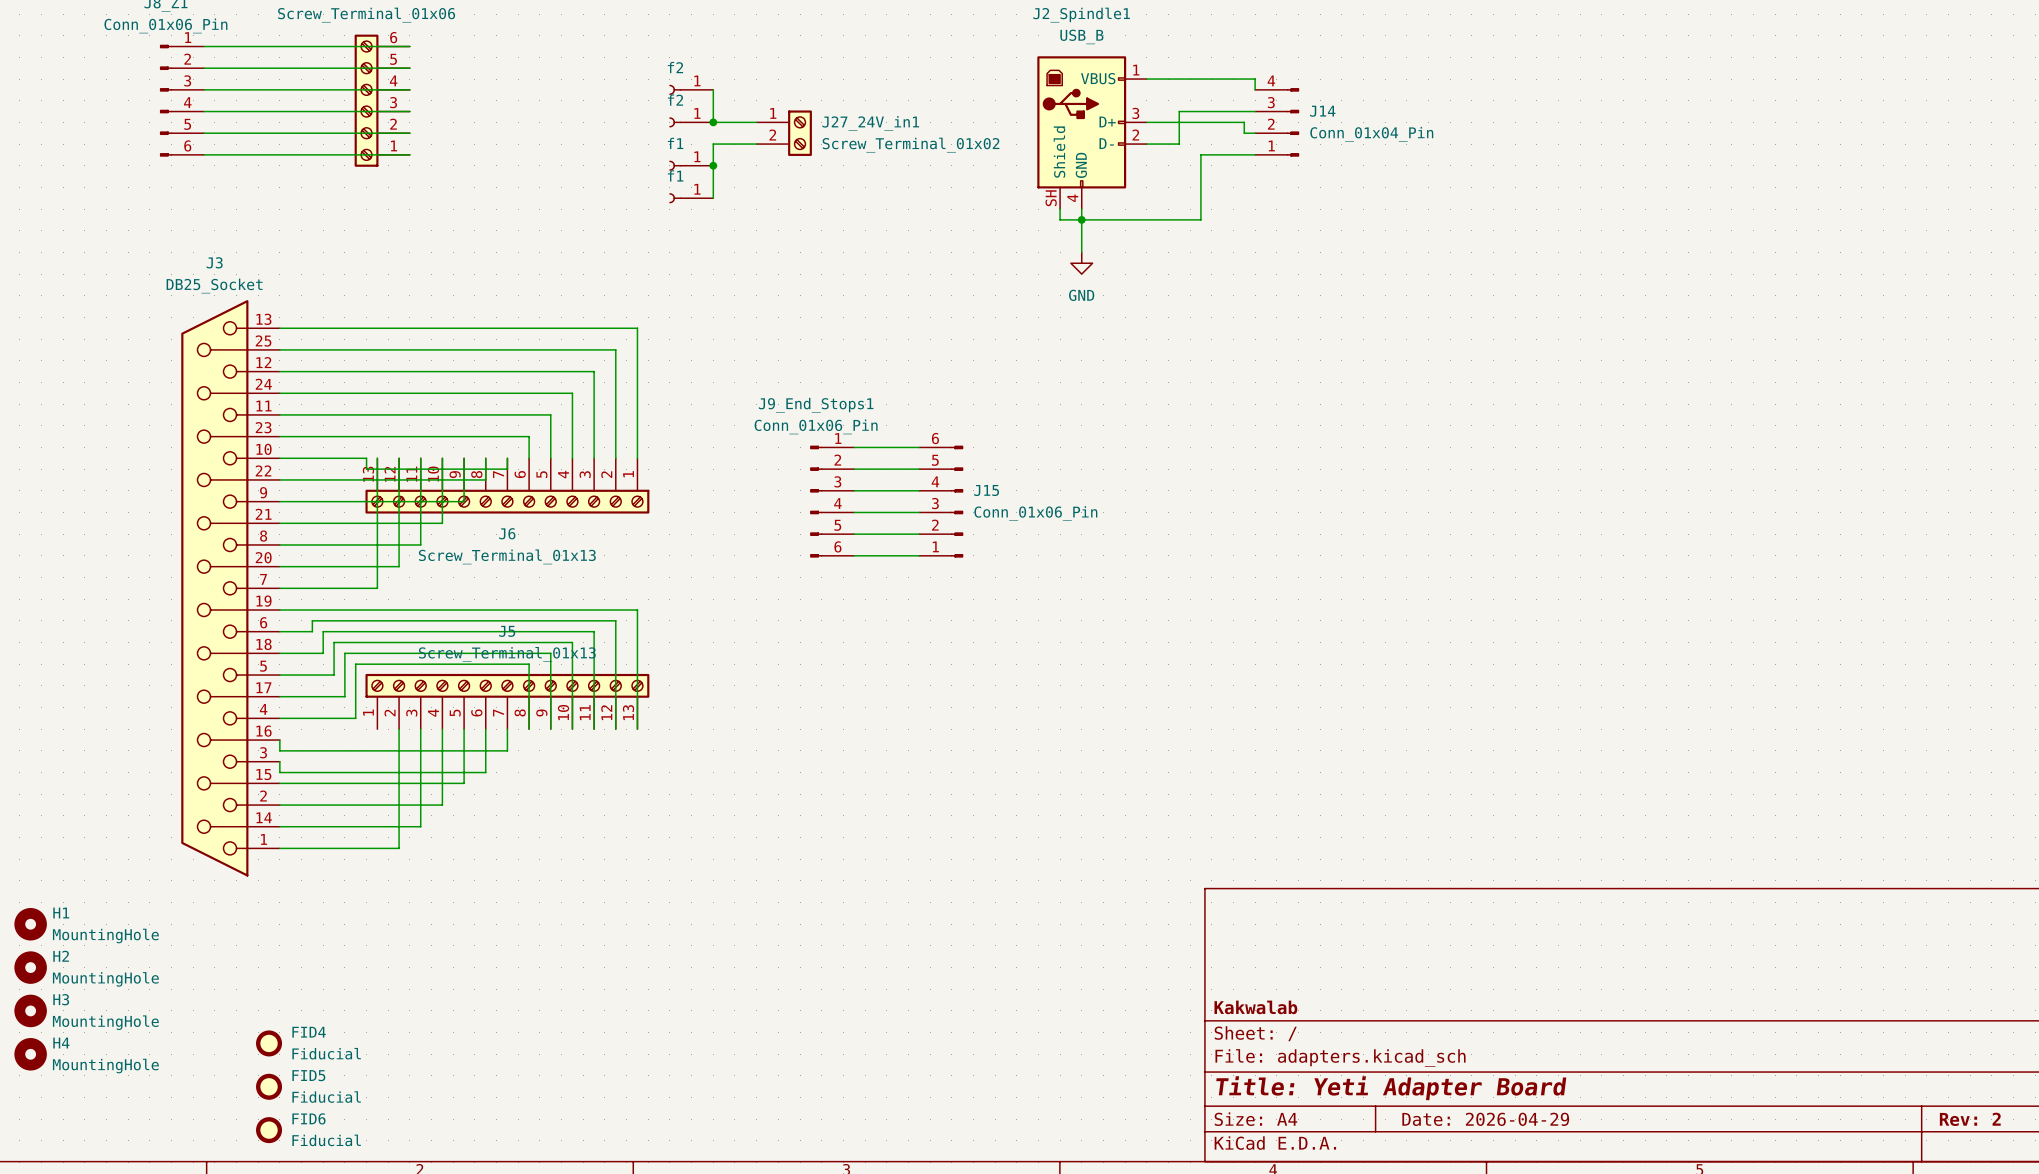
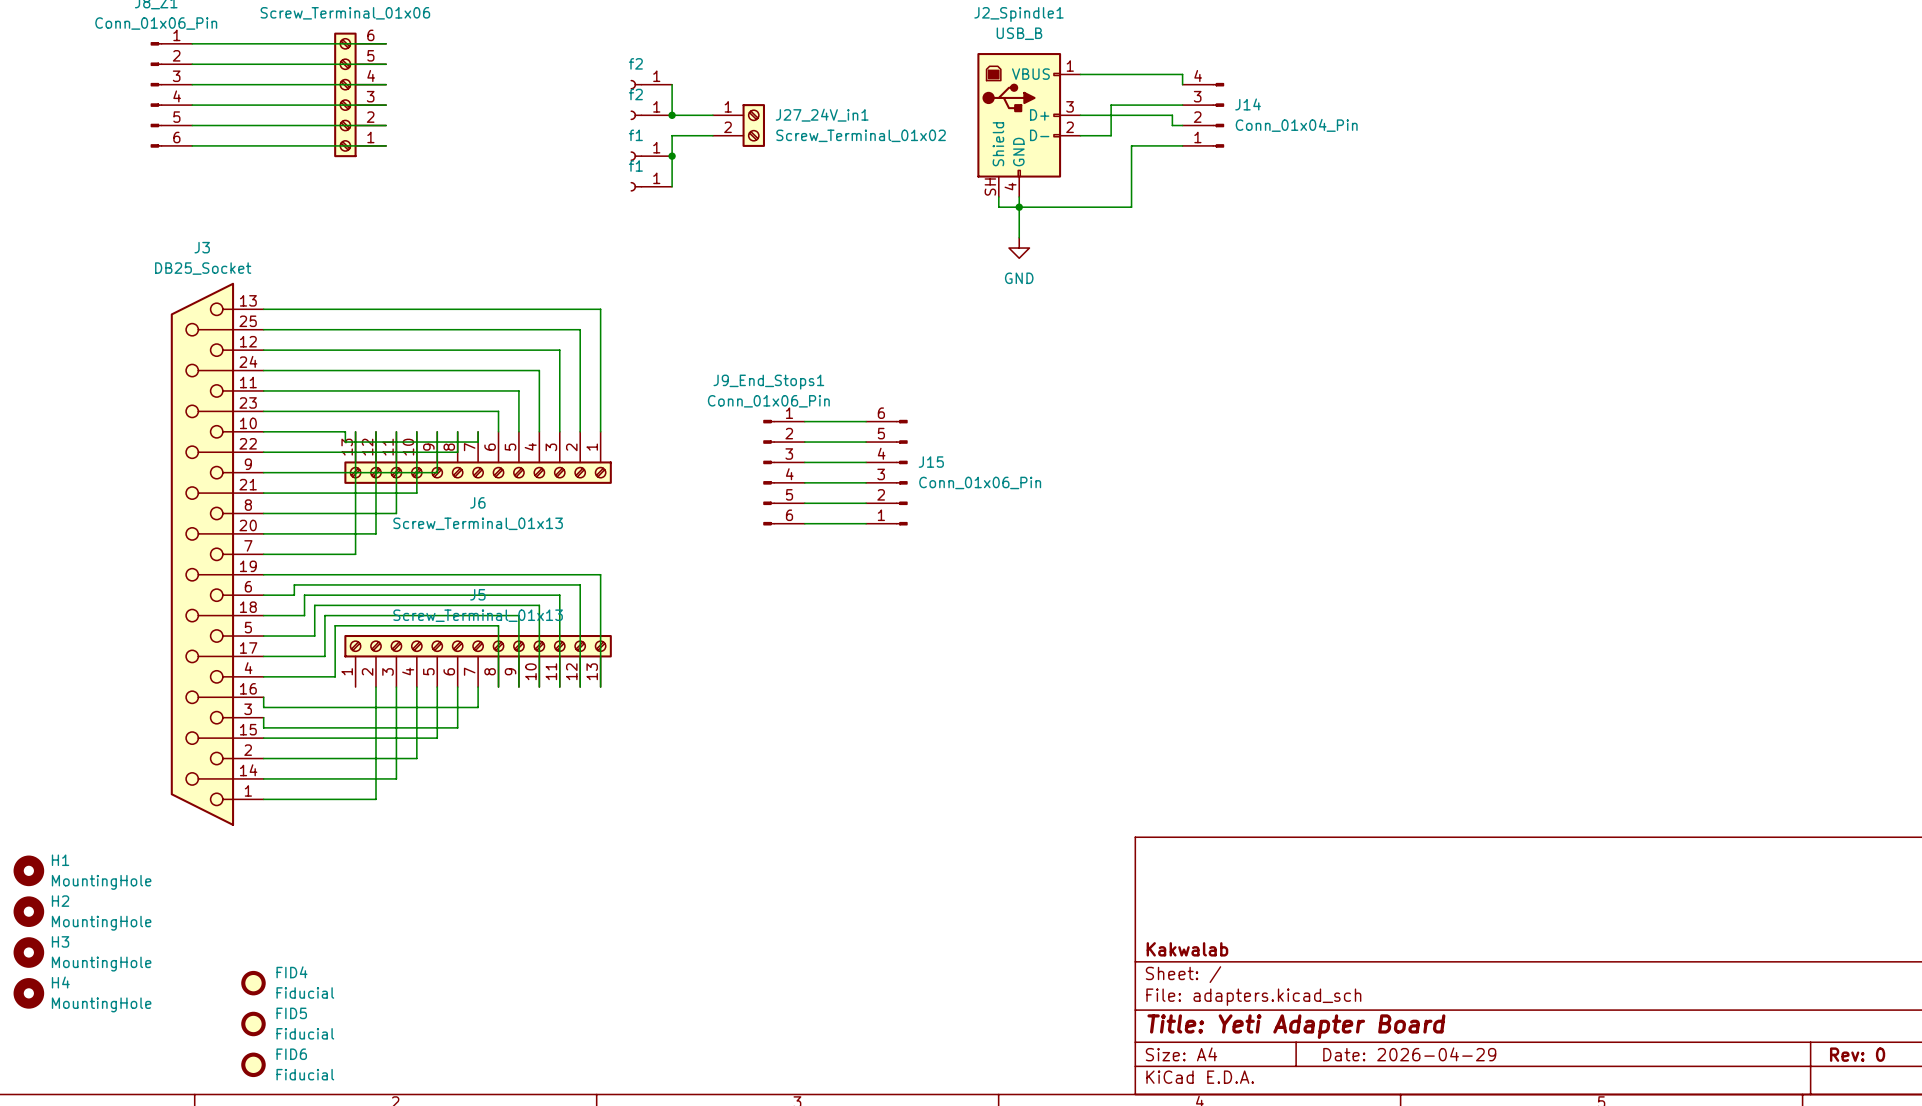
title block: Rev: 2 (1970, 1119) -> Rev: 0 (1857, 1054)

